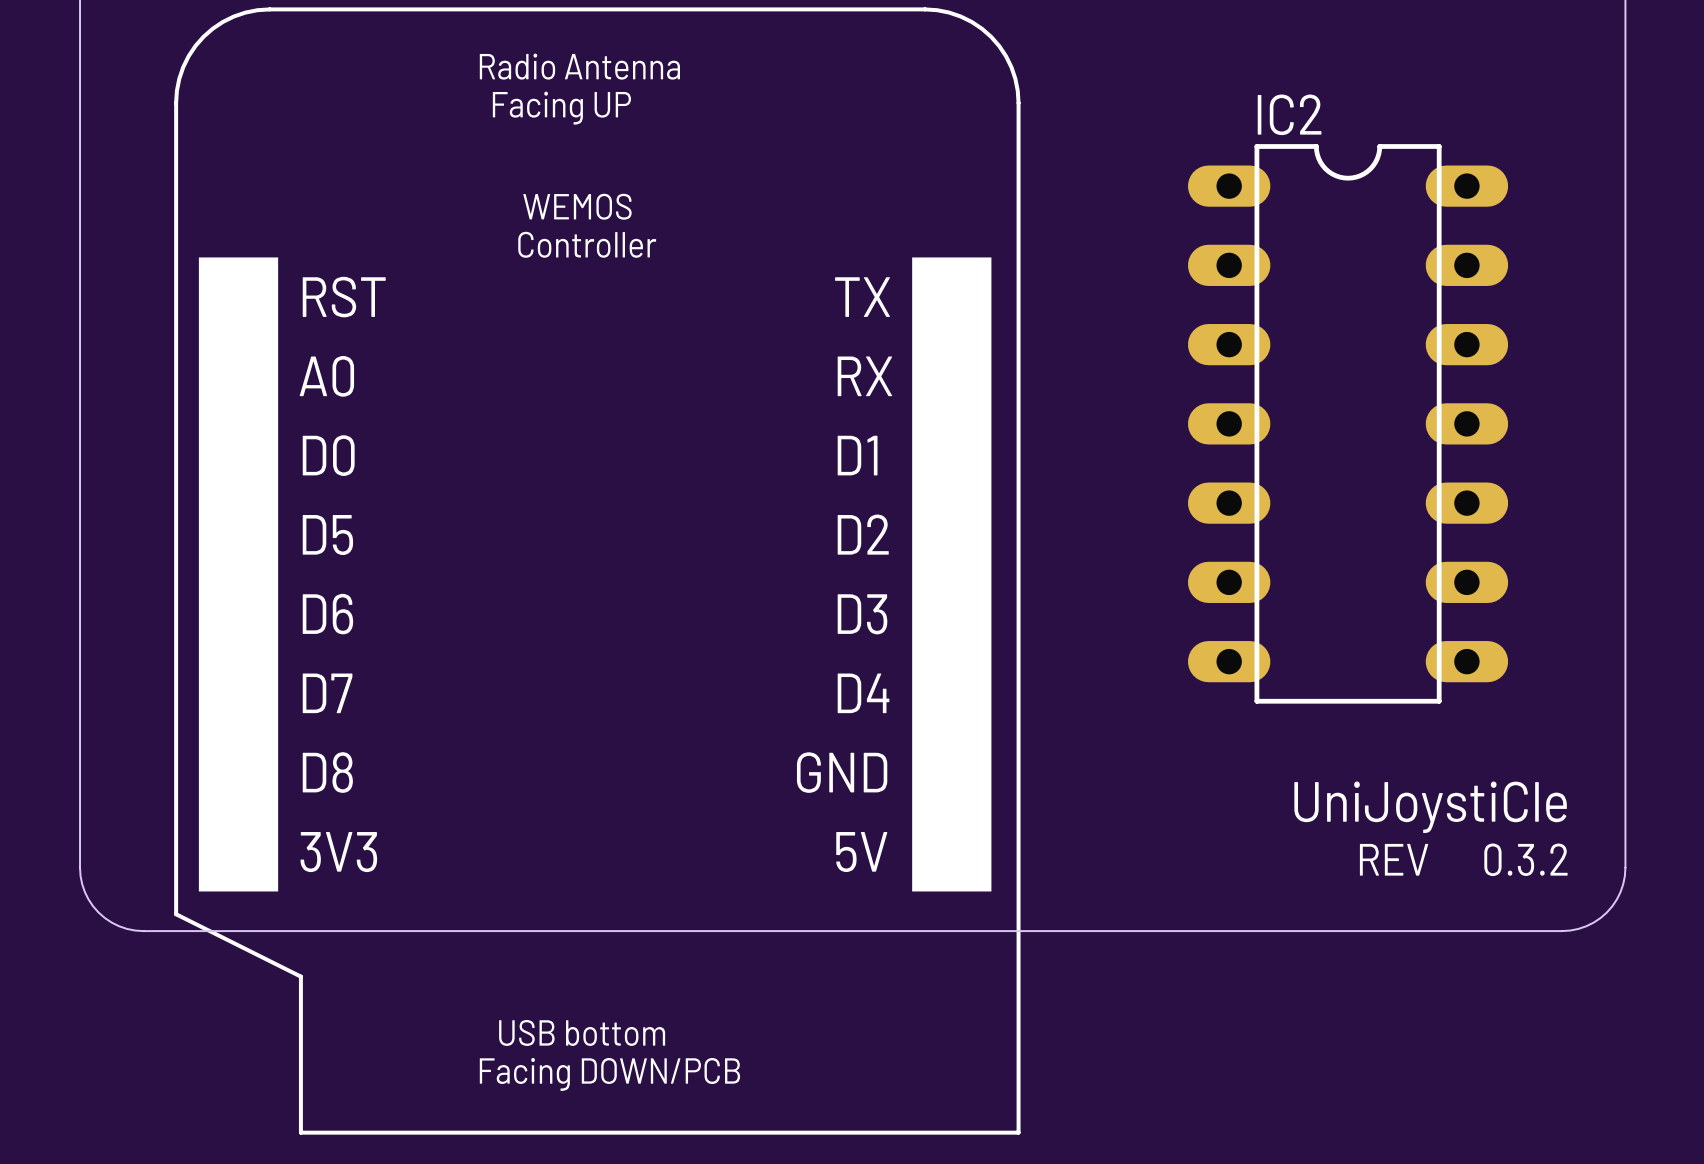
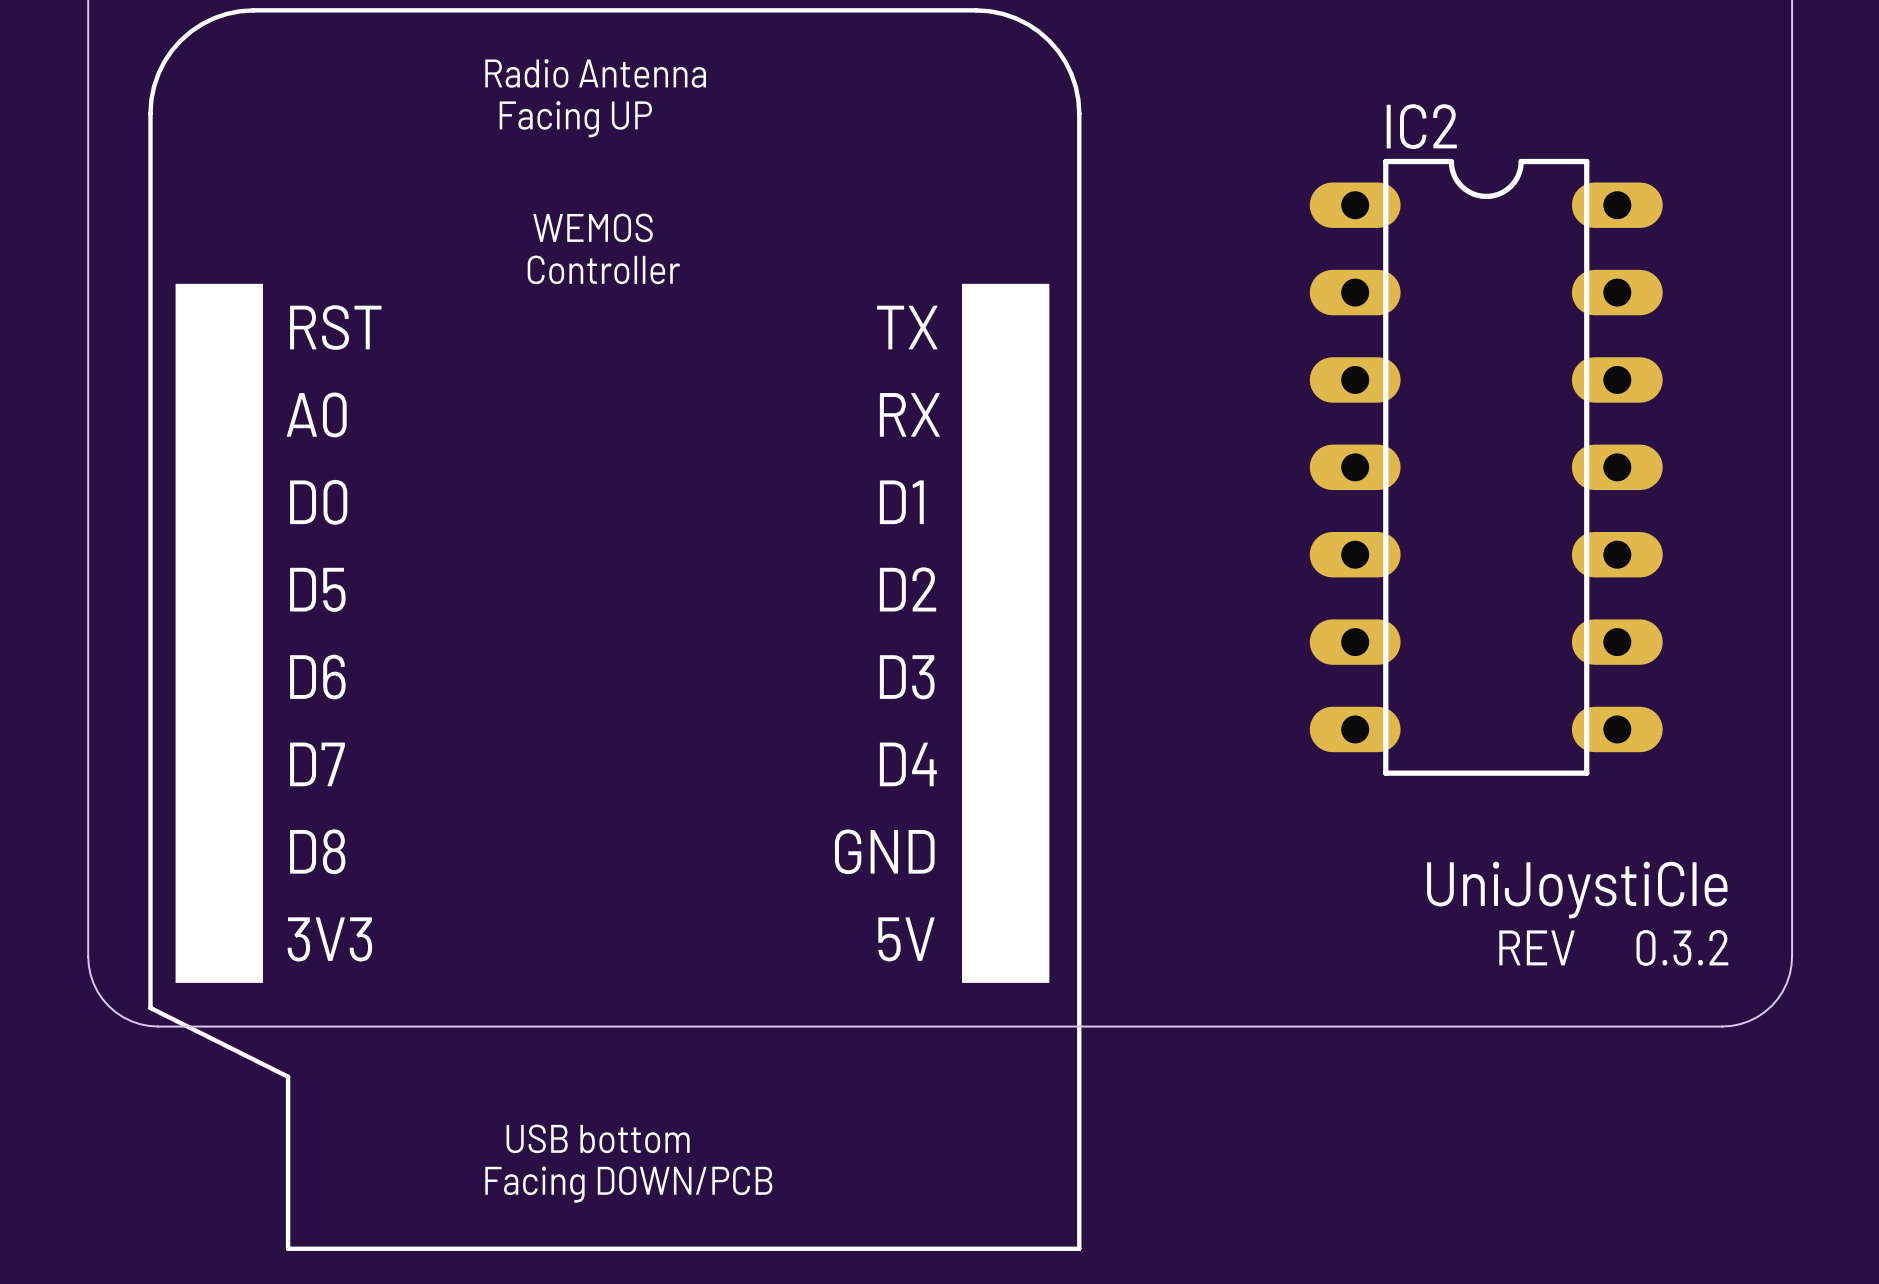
part position: (597, 571) -> (614, 629)

